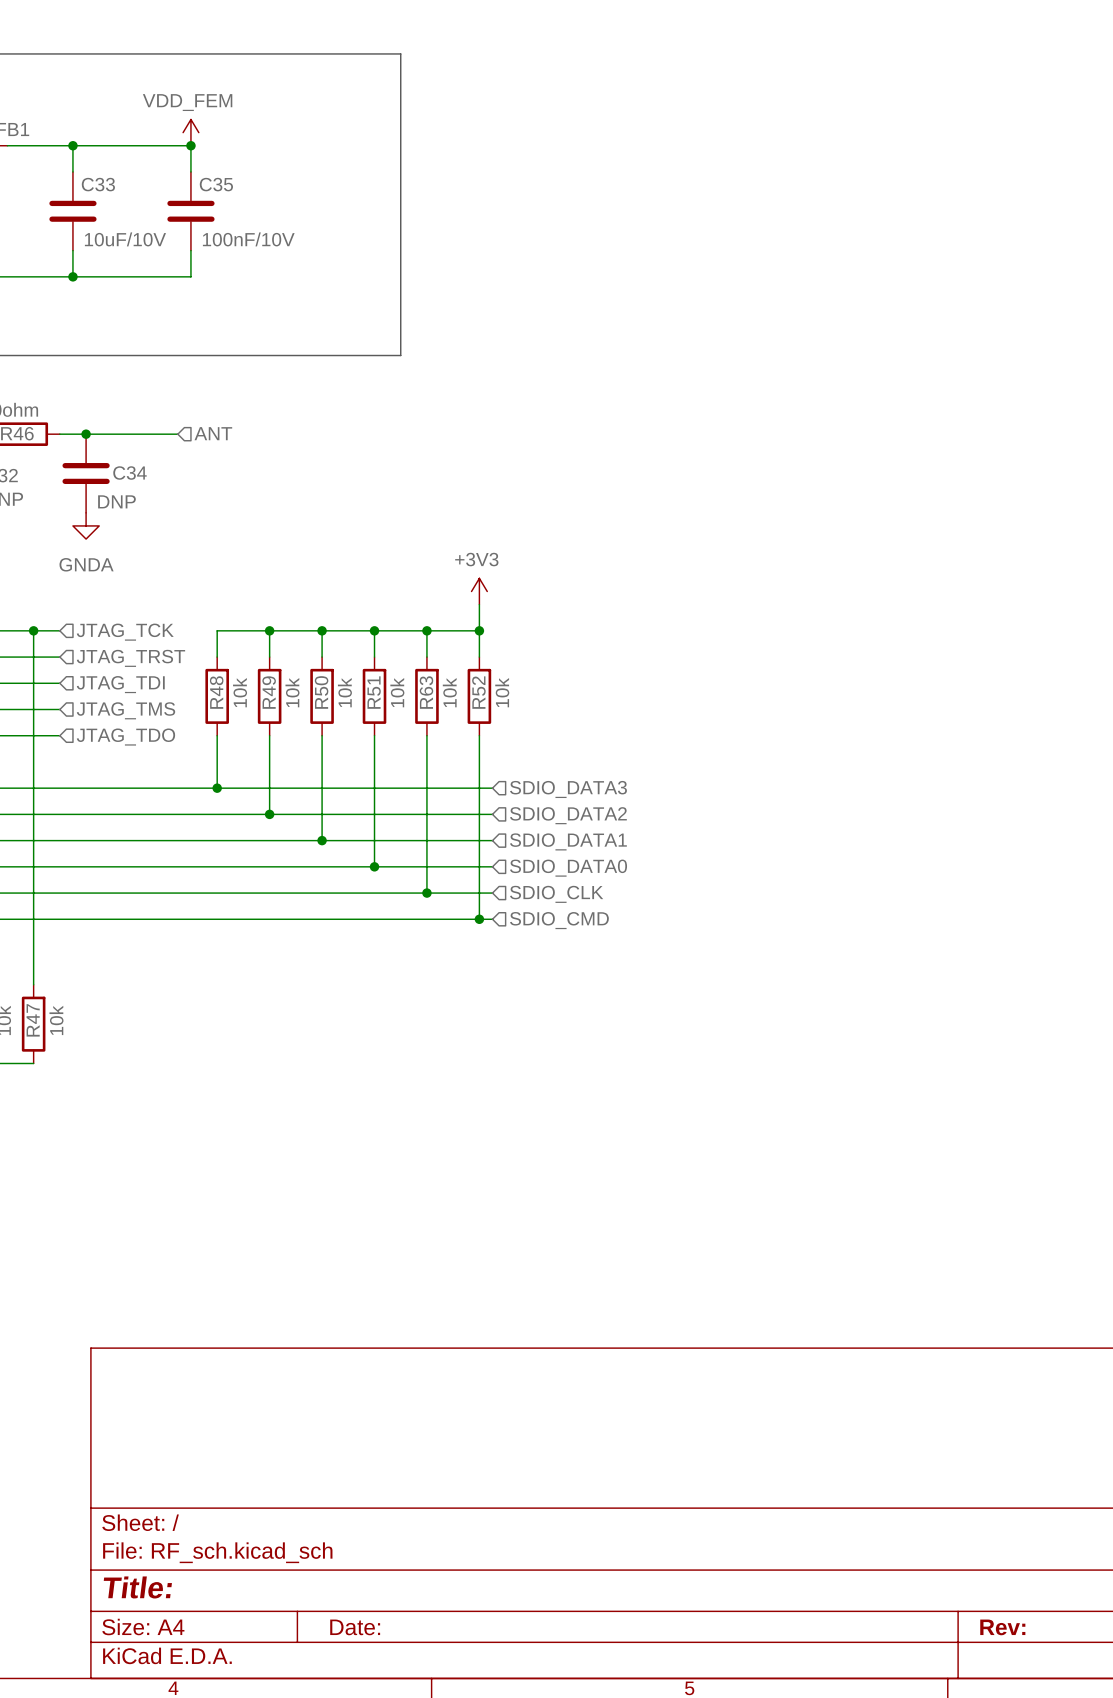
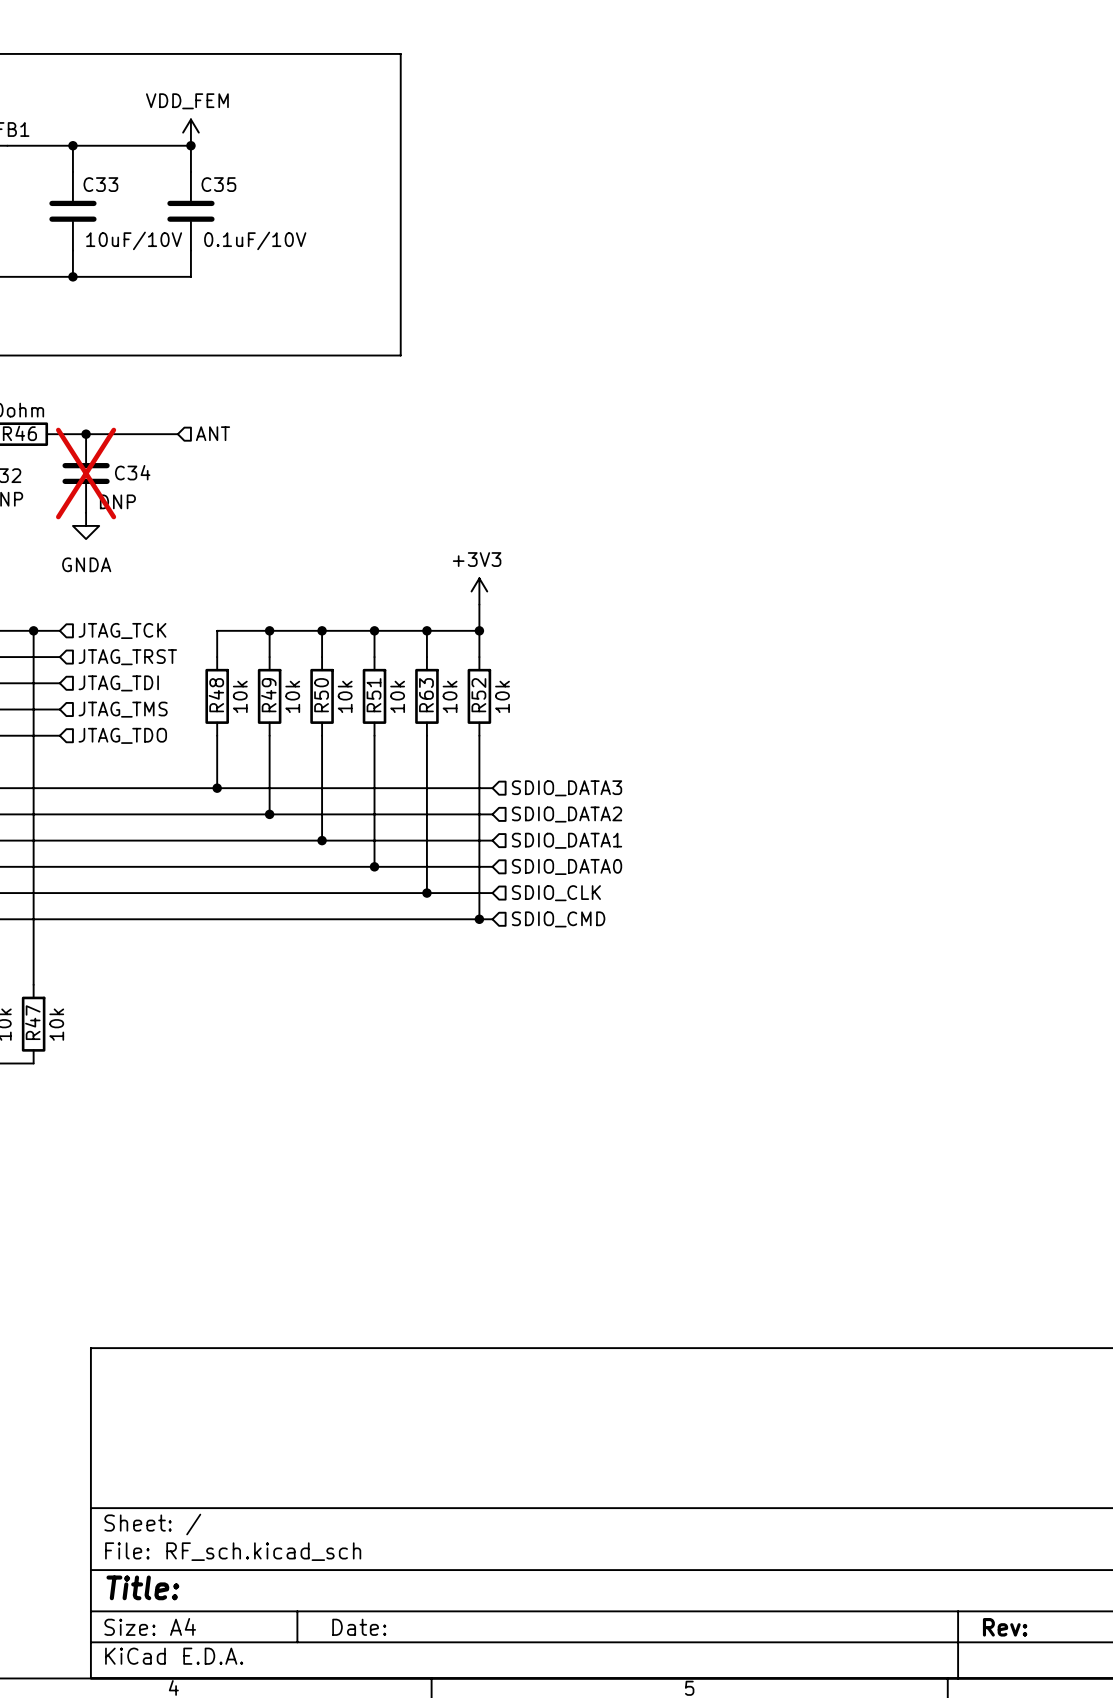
C35 value: 100nF/10V (248, 239) -> 0.1uF/10V (255, 240)
C34 do-not-place cross: none -> (86, 473)

